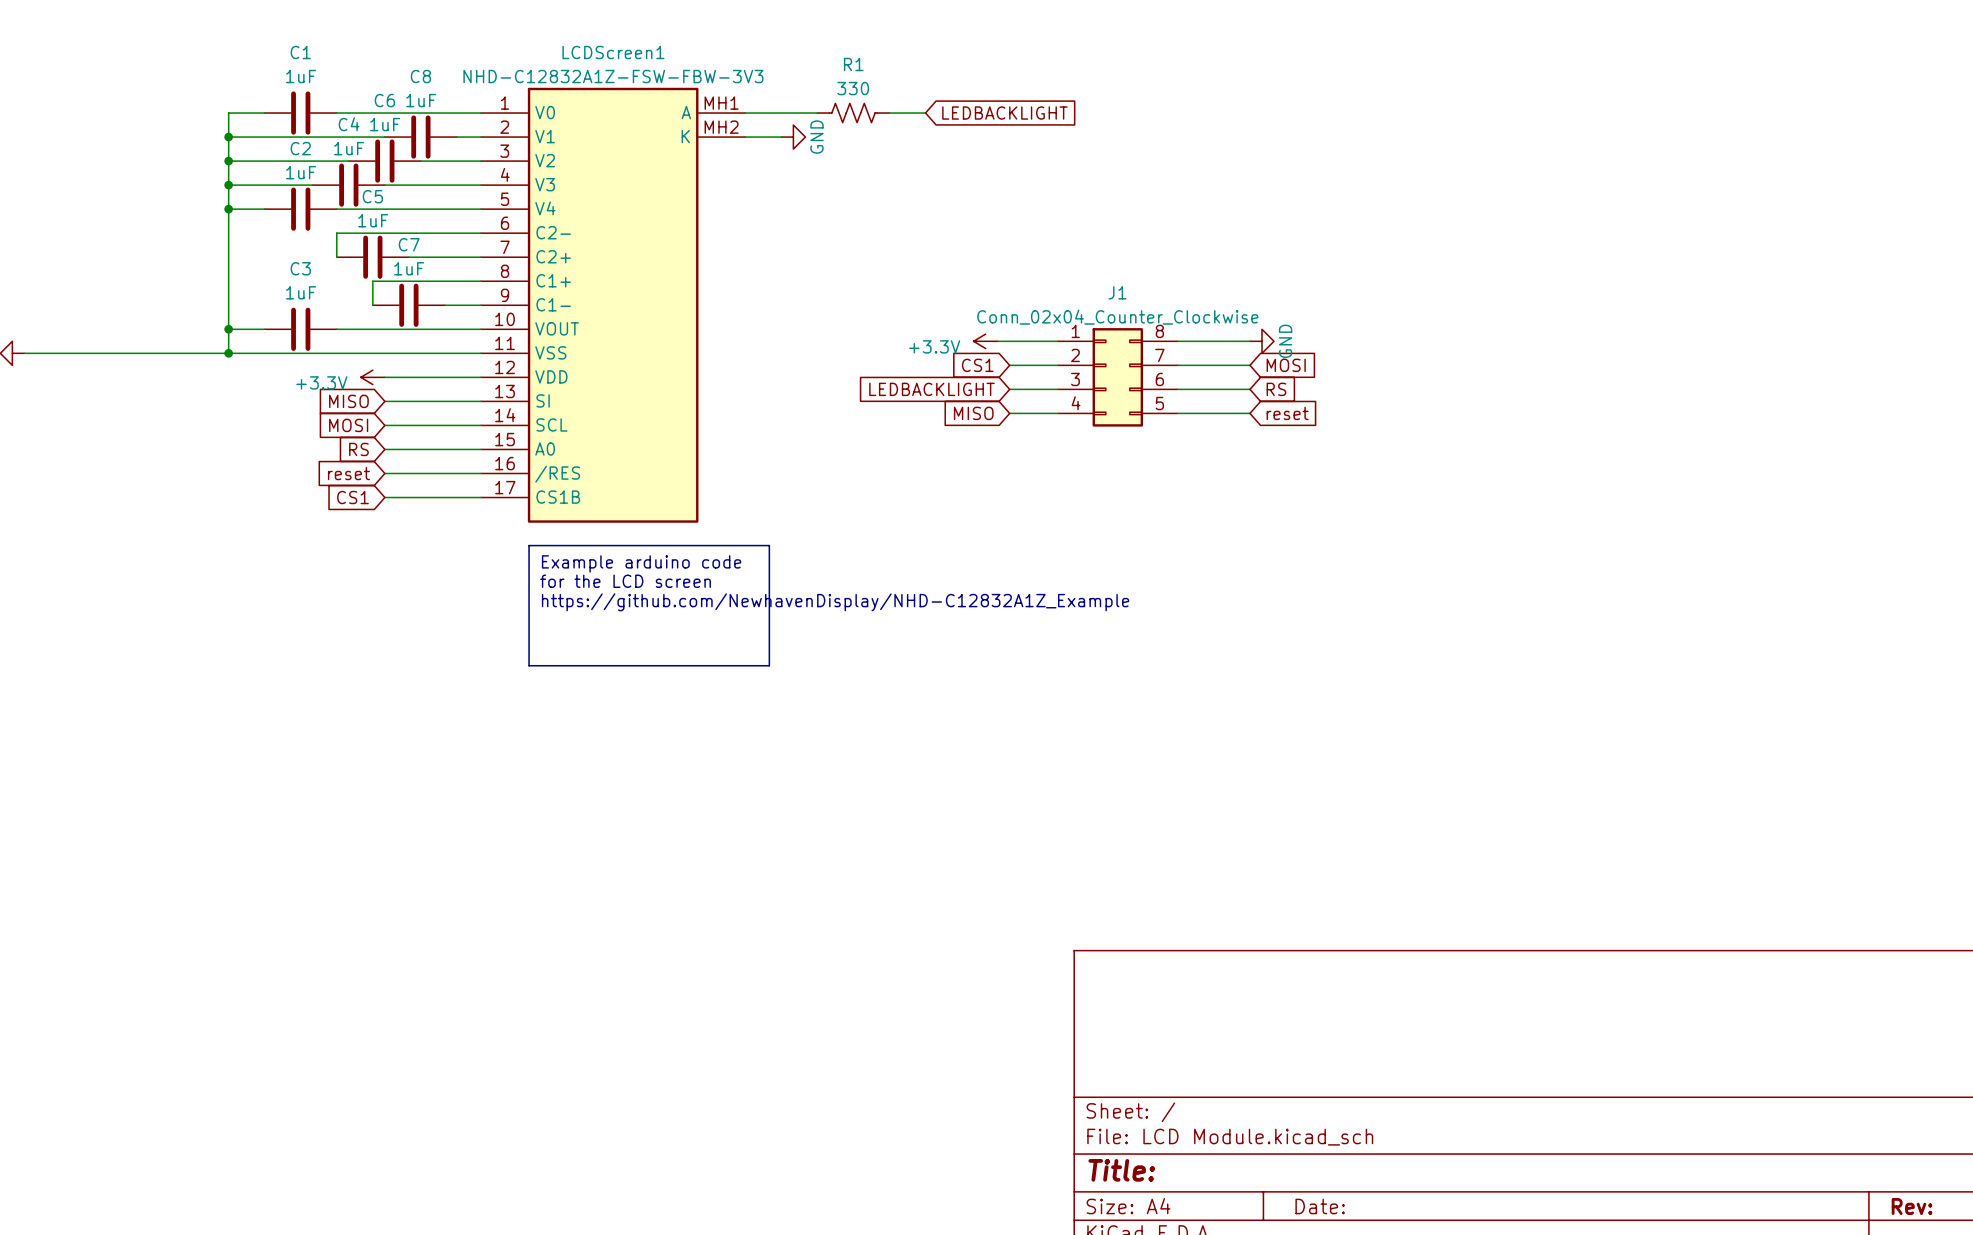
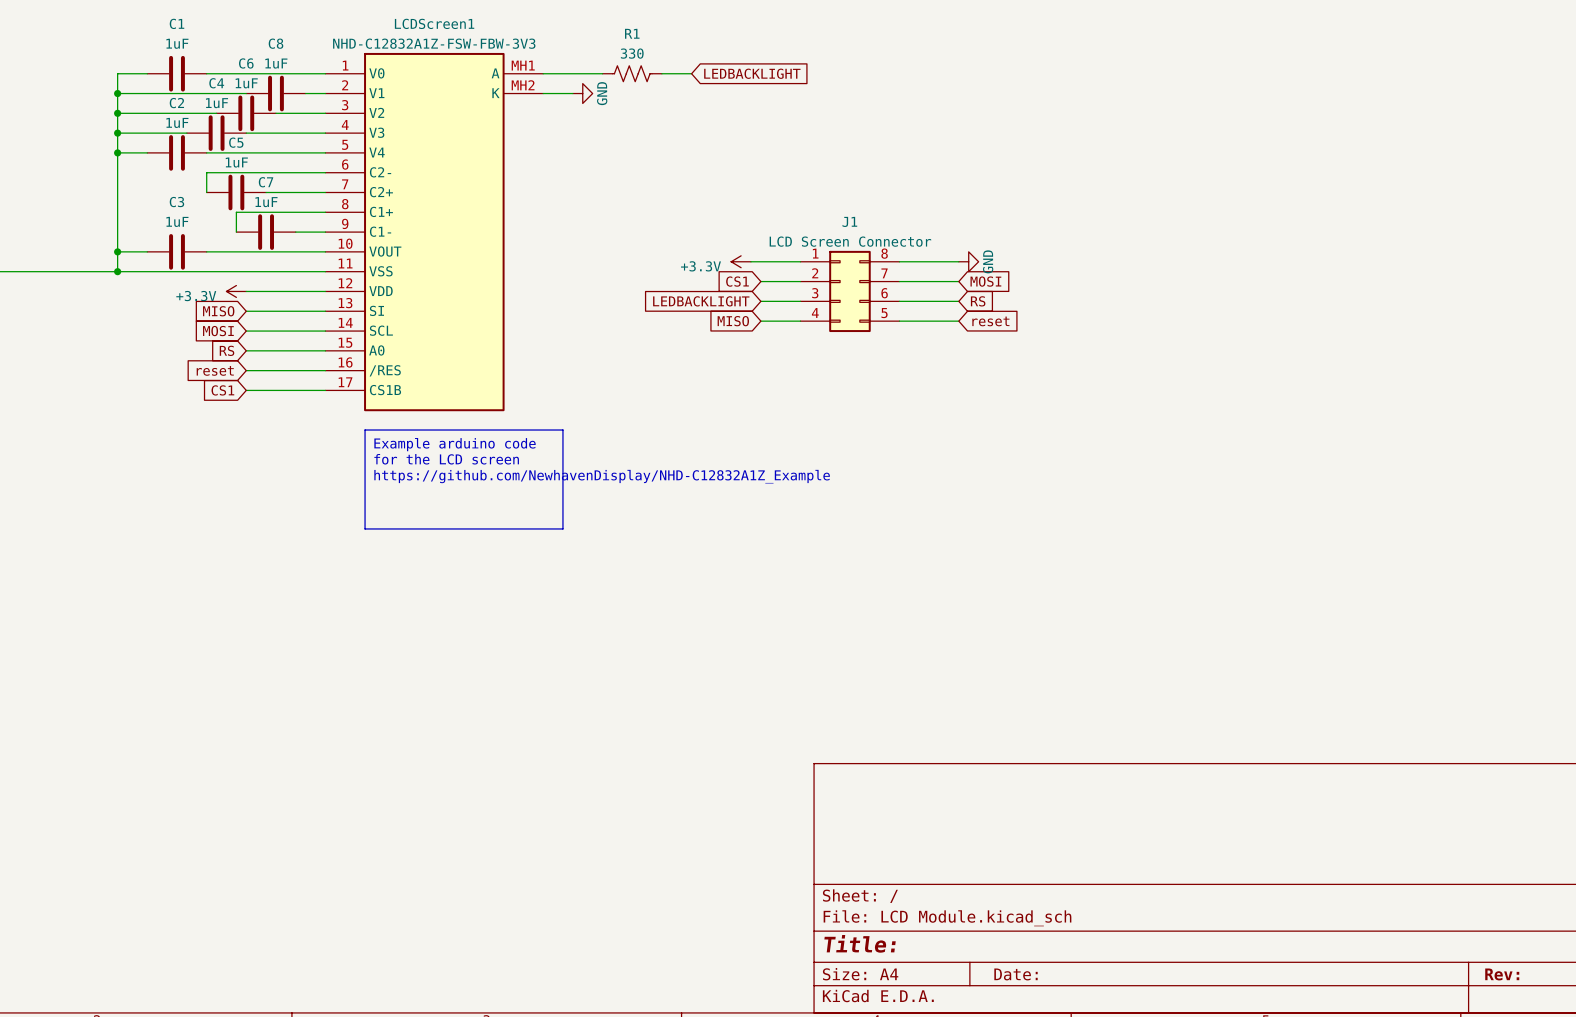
J1 value: Conn_02x04_Counter_Clockwise (1117, 317) -> LCD Screen Connector (850, 241)

